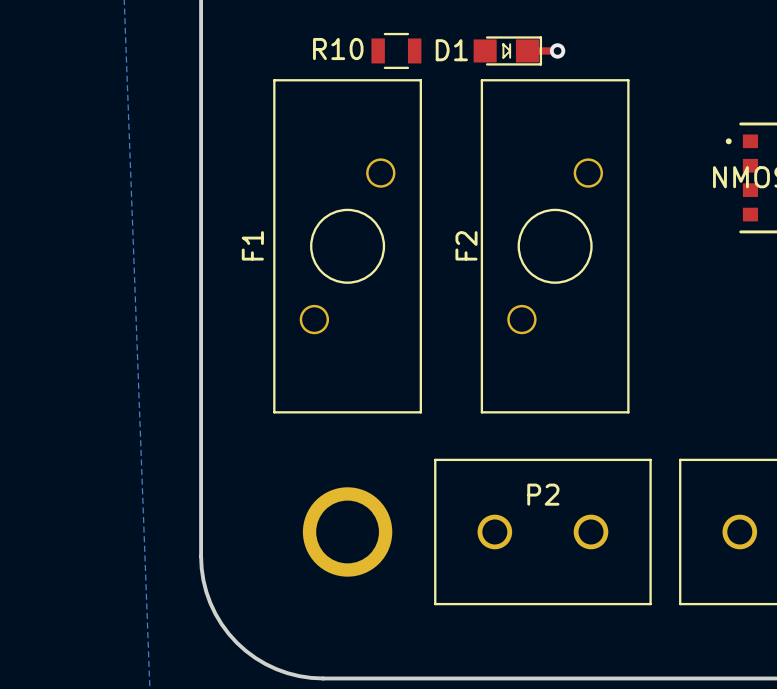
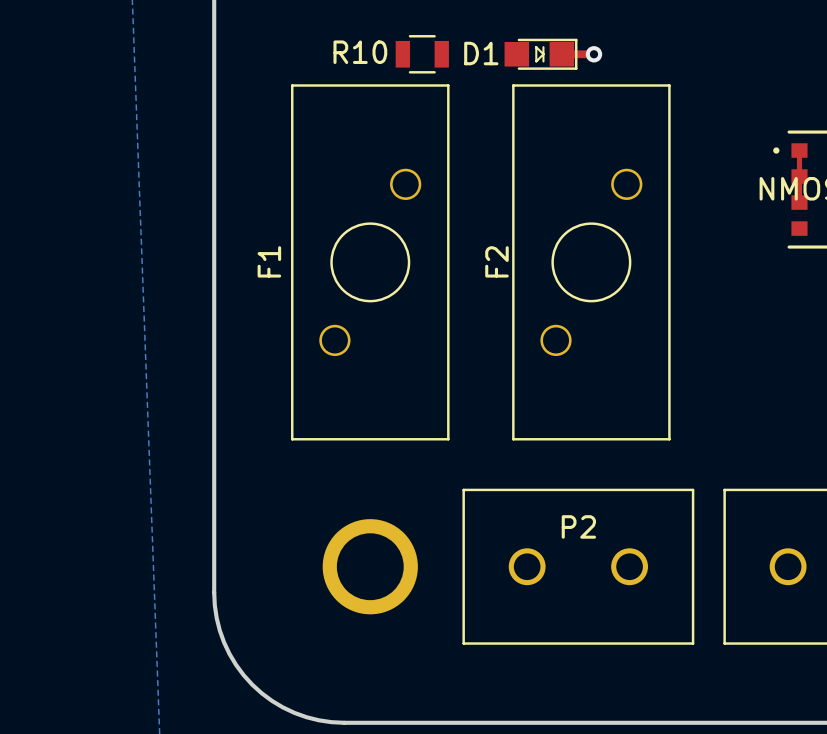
top track: none -> (799, 150) (799, 202)

